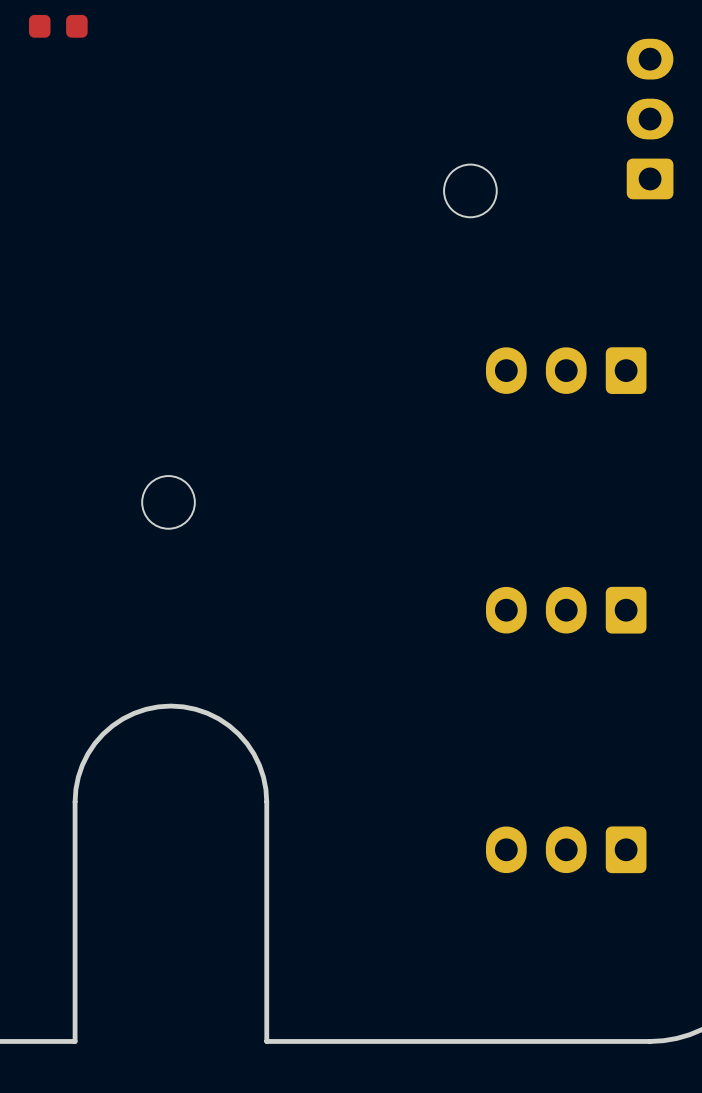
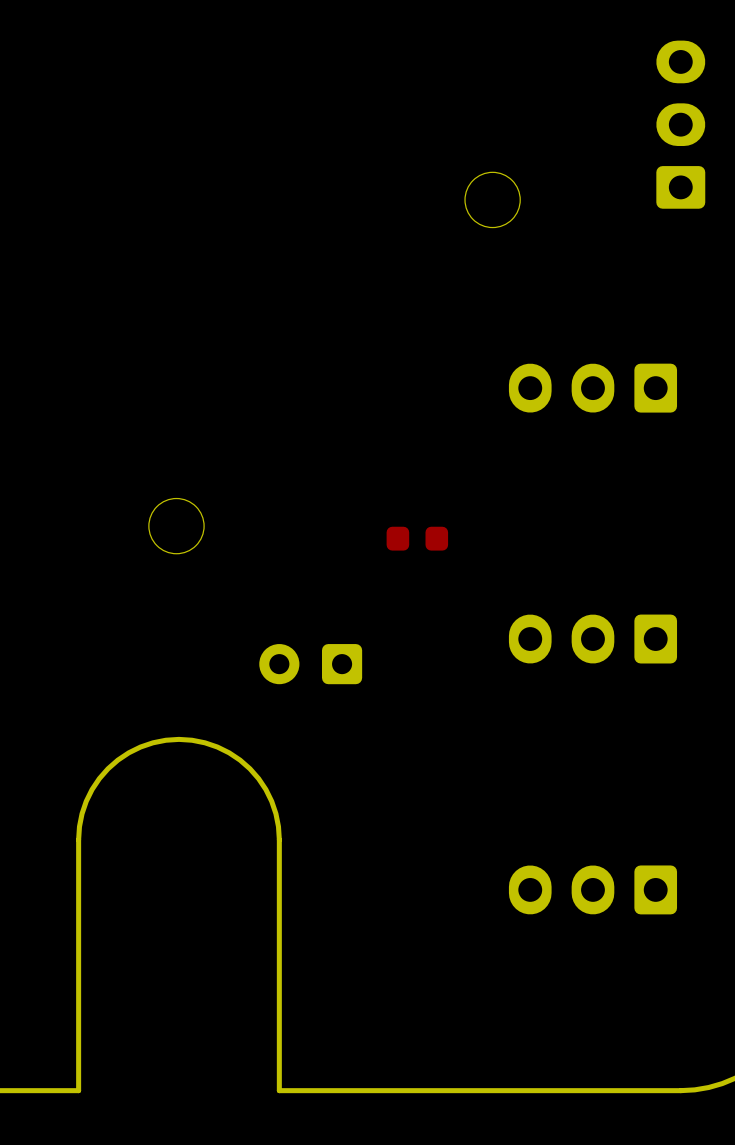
part position: (58, 26) -> (417, 538)
part: none -> (310, 664)

